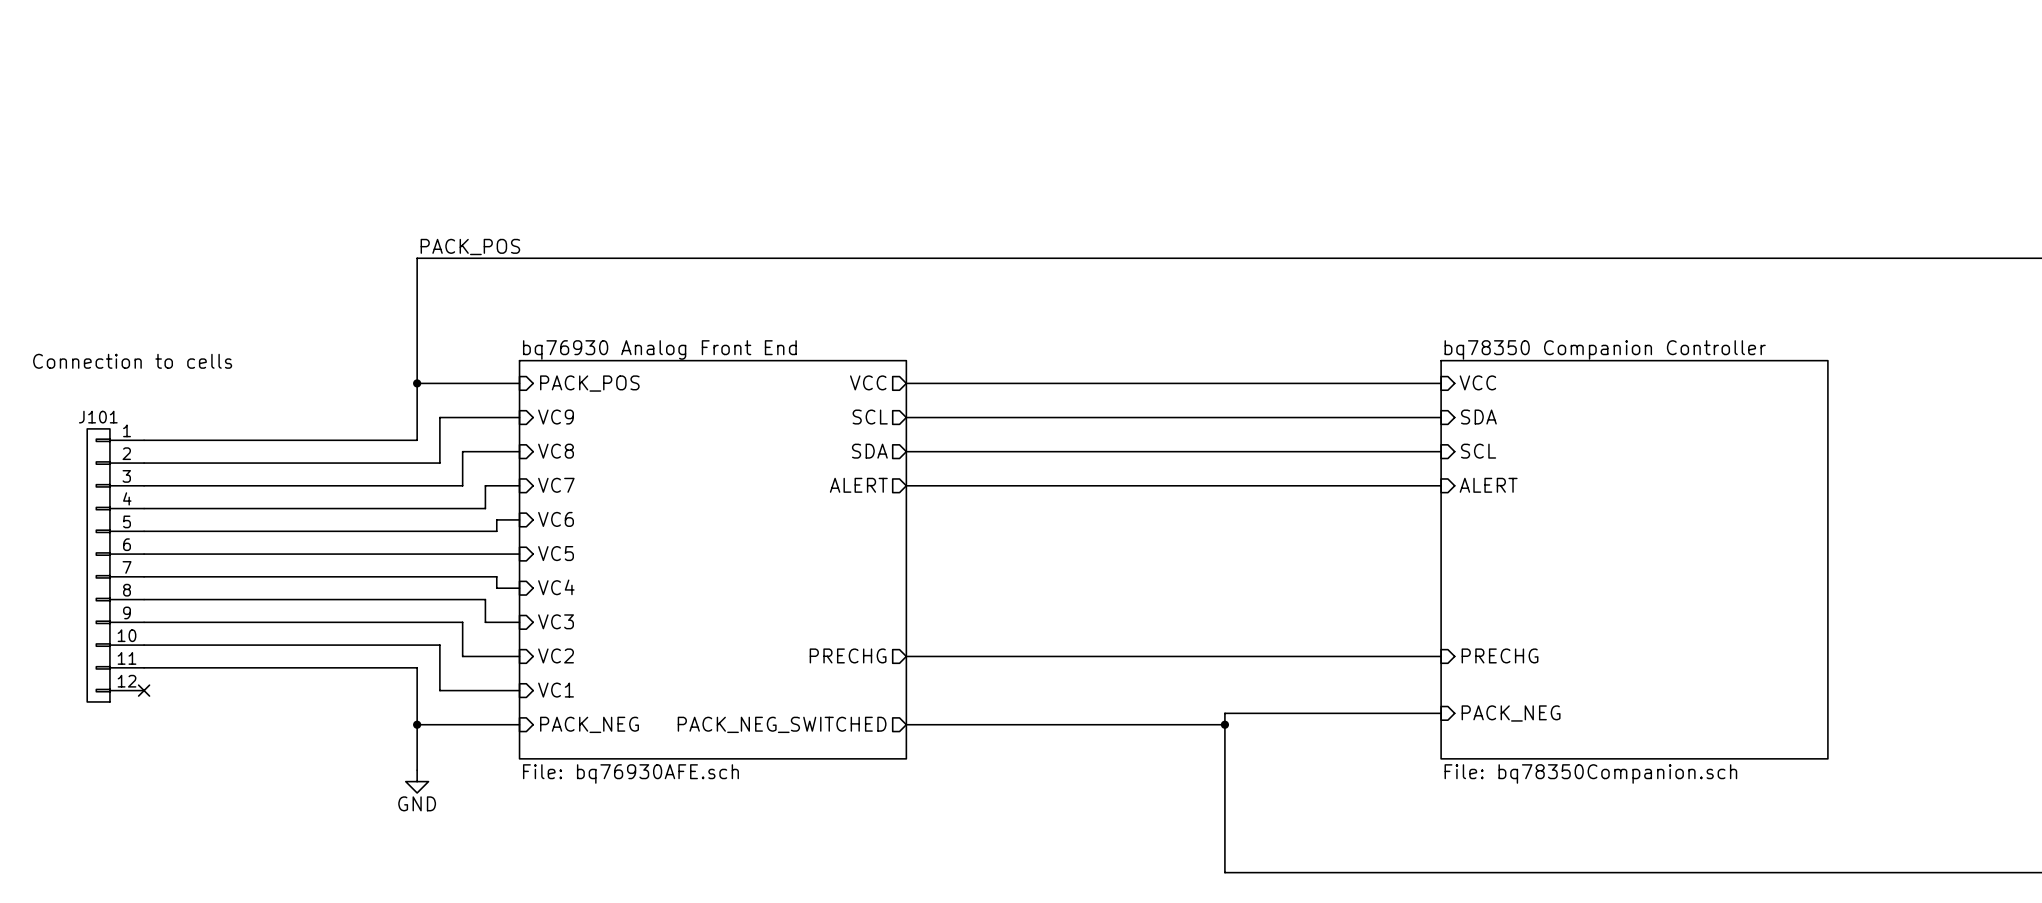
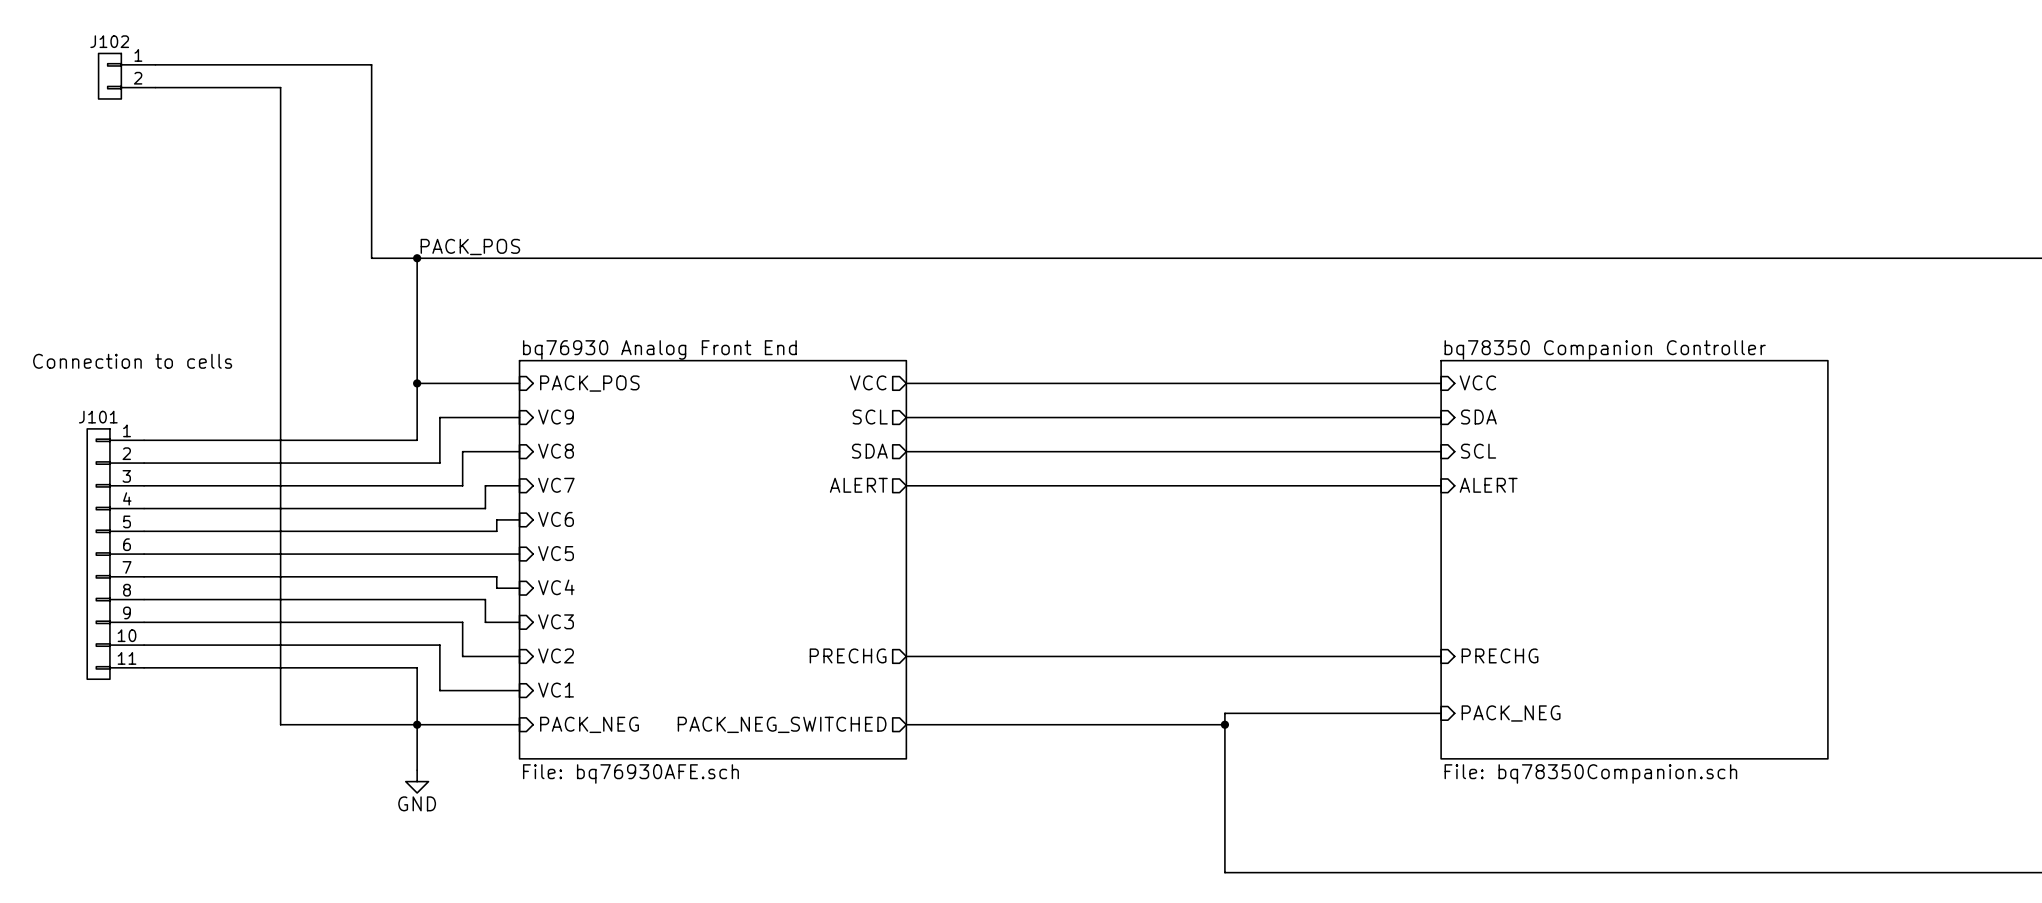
wire: none -> (155, 64) (371, 64) (371, 258) (417, 258)
J102: none -> (127, 76)
wire: none -> (155, 87) (280, 87) (280, 724) (417, 724)
junction: none -> (417, 258)
J101 symbol: [87, 428, 145, 702] -> [87, 428, 145, 680]
no-connect mark: (144, 690) -> none

